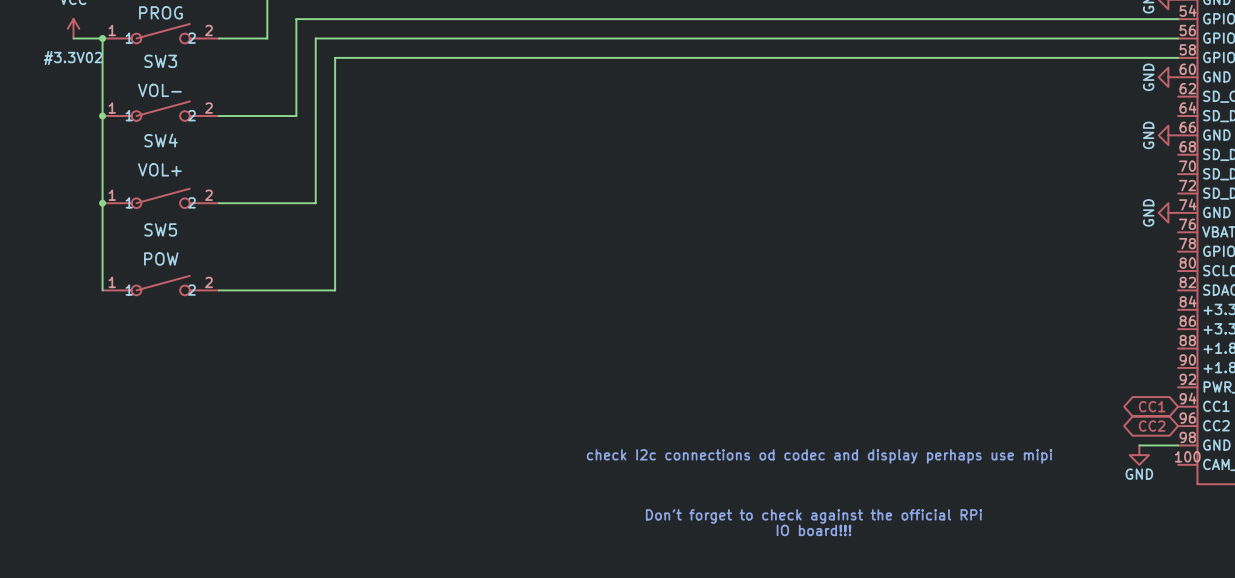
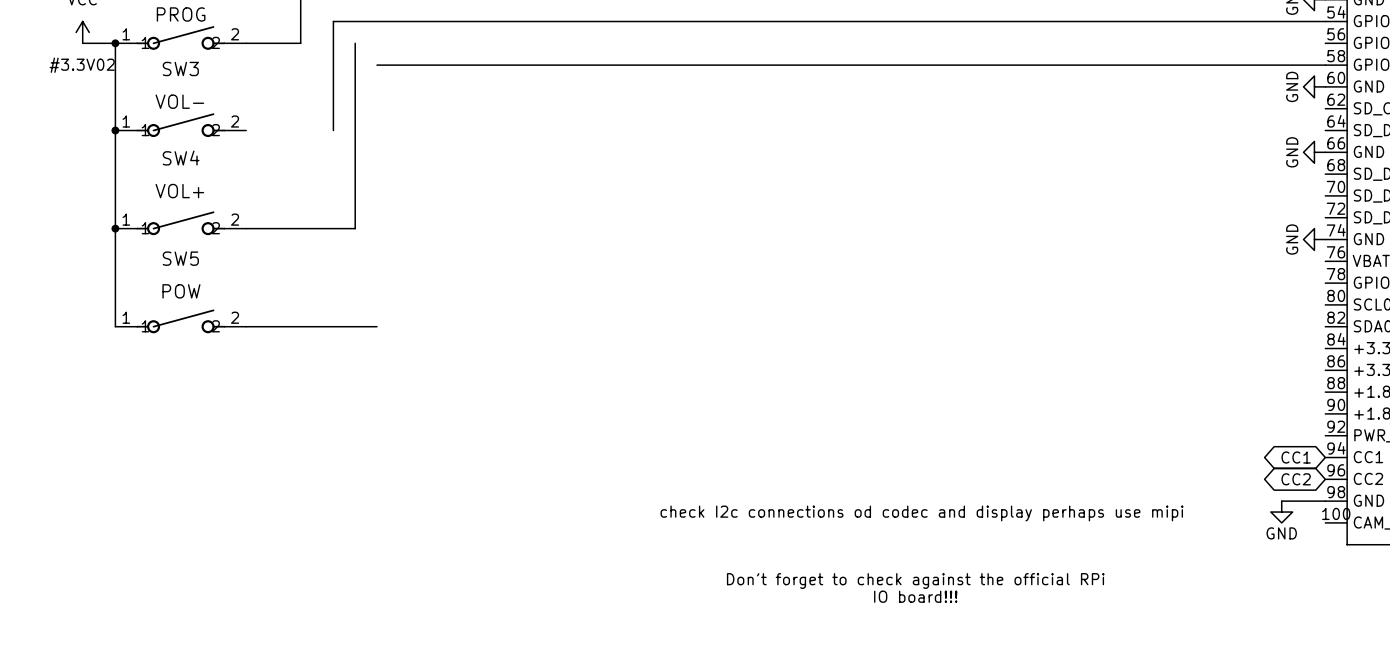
wire: (315, 38) (1178, 38) -> none
wire: (335, 57) (335, 290) -> none
wire: (218, 116) (296, 116) -> none

